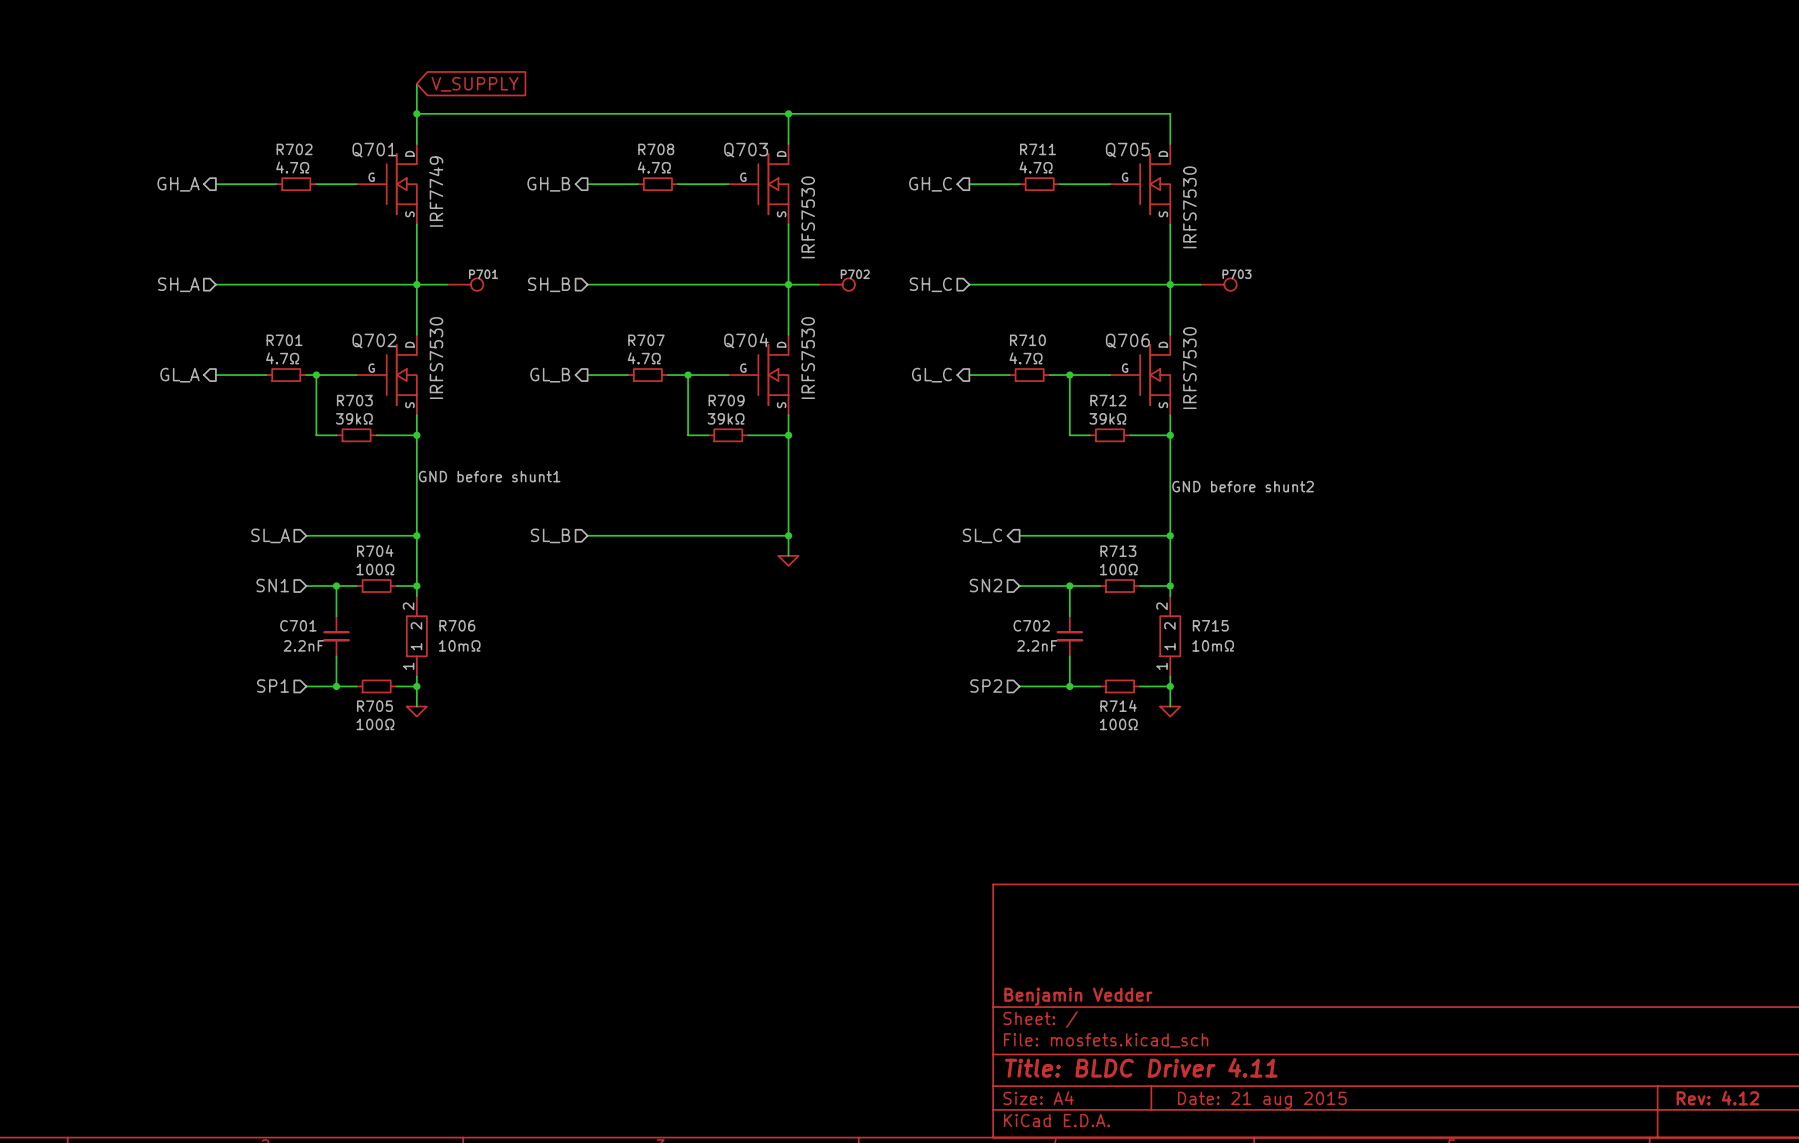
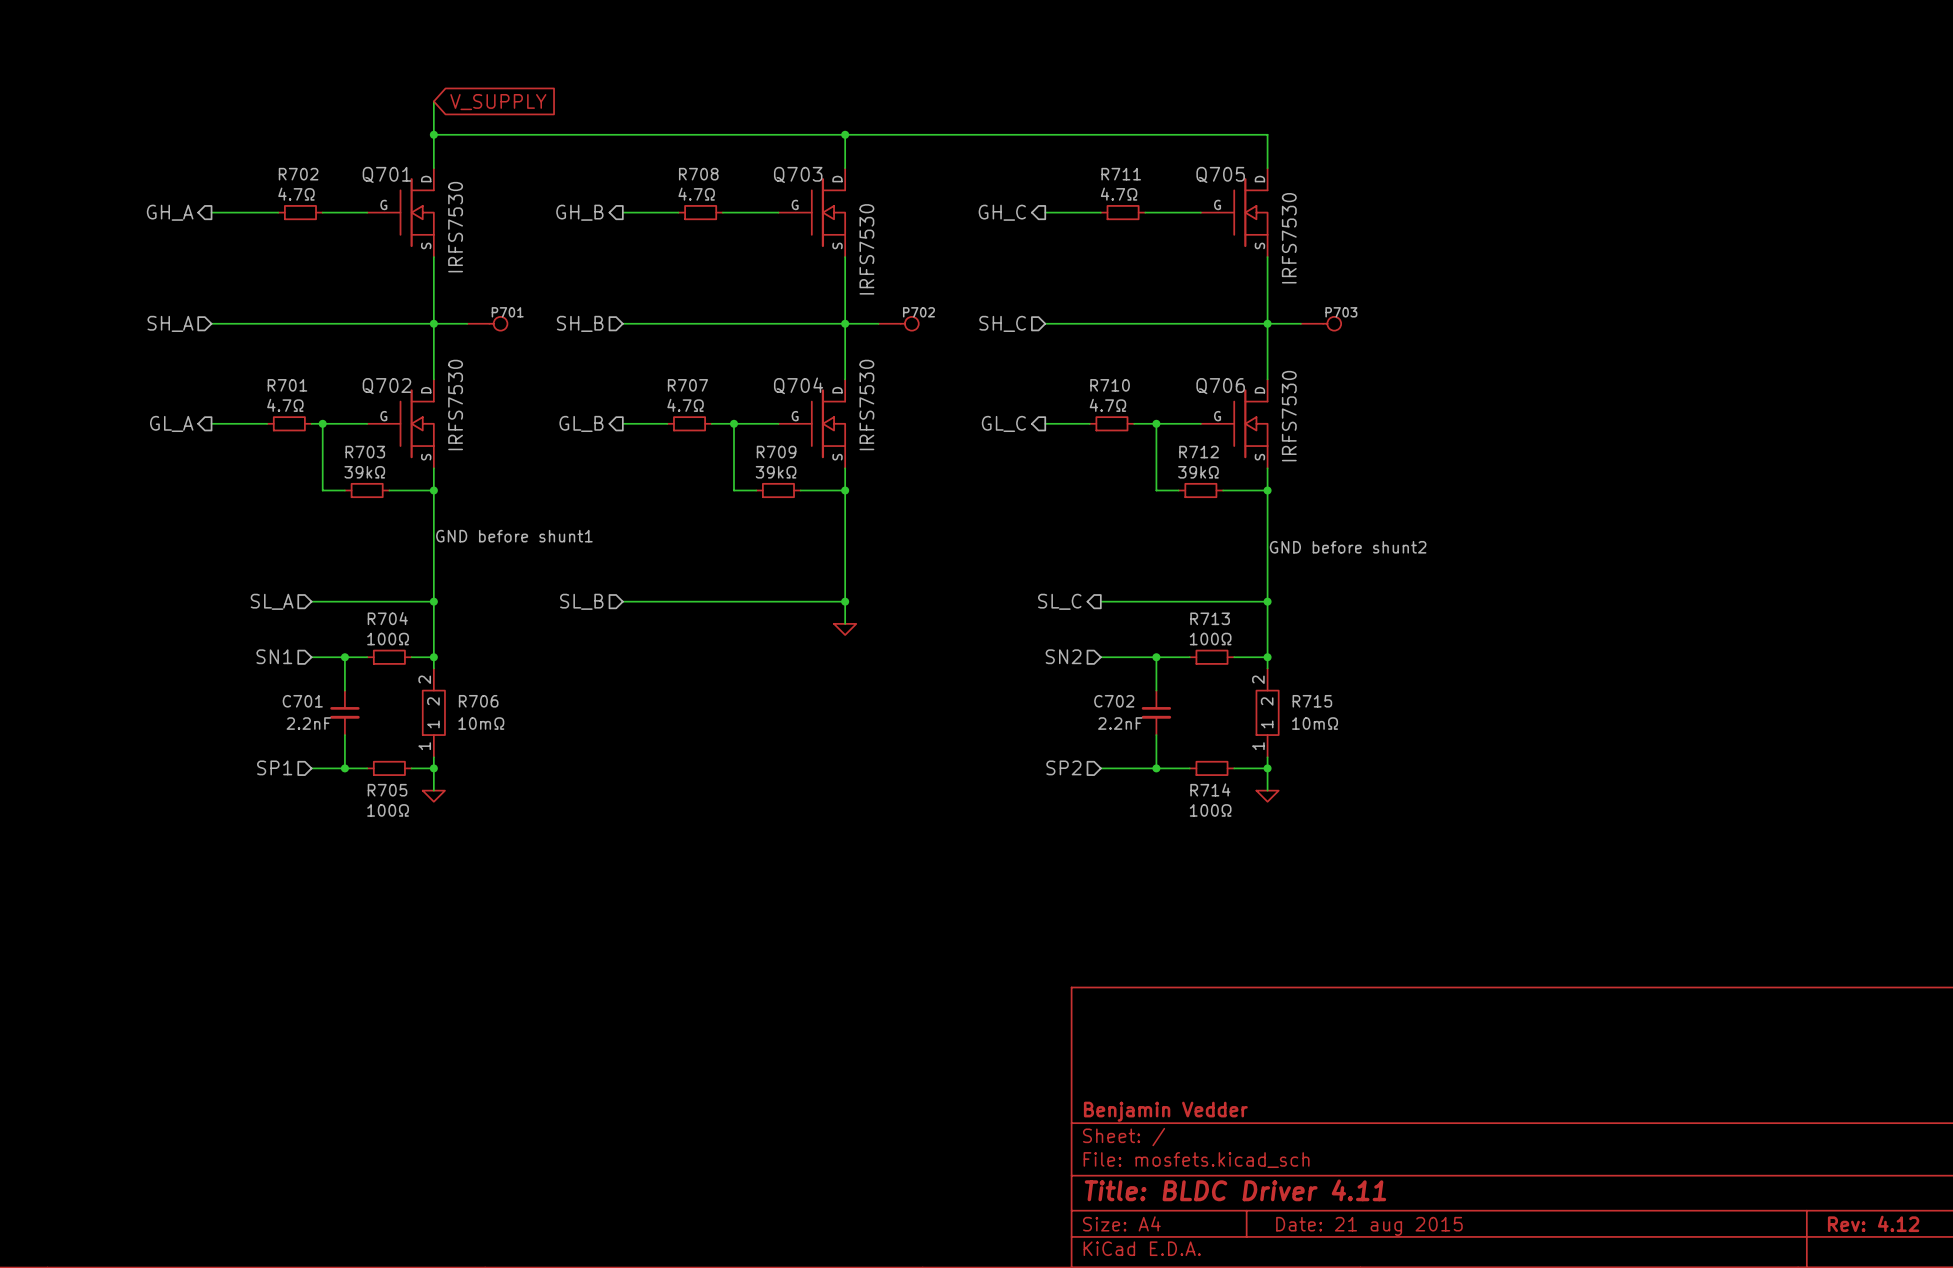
Q701 value: IRF7749 (436, 191) -> IRFS7530 (455, 227)

